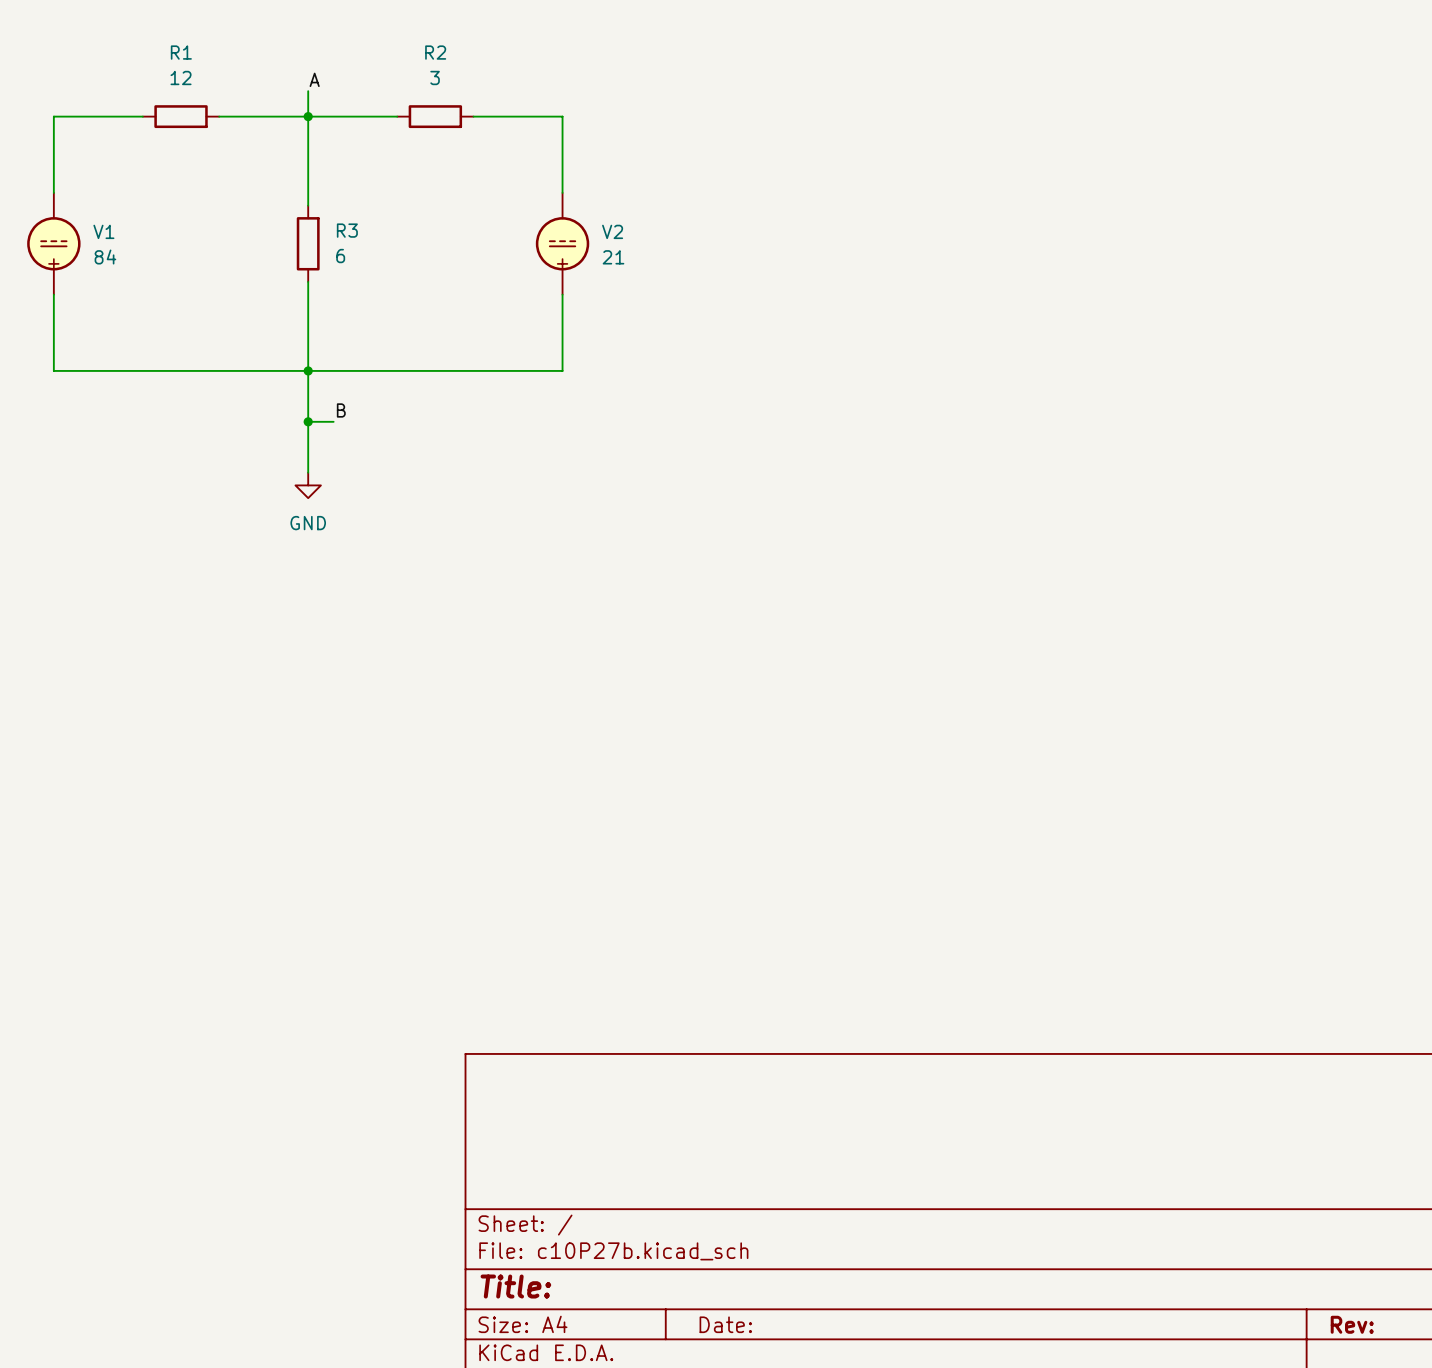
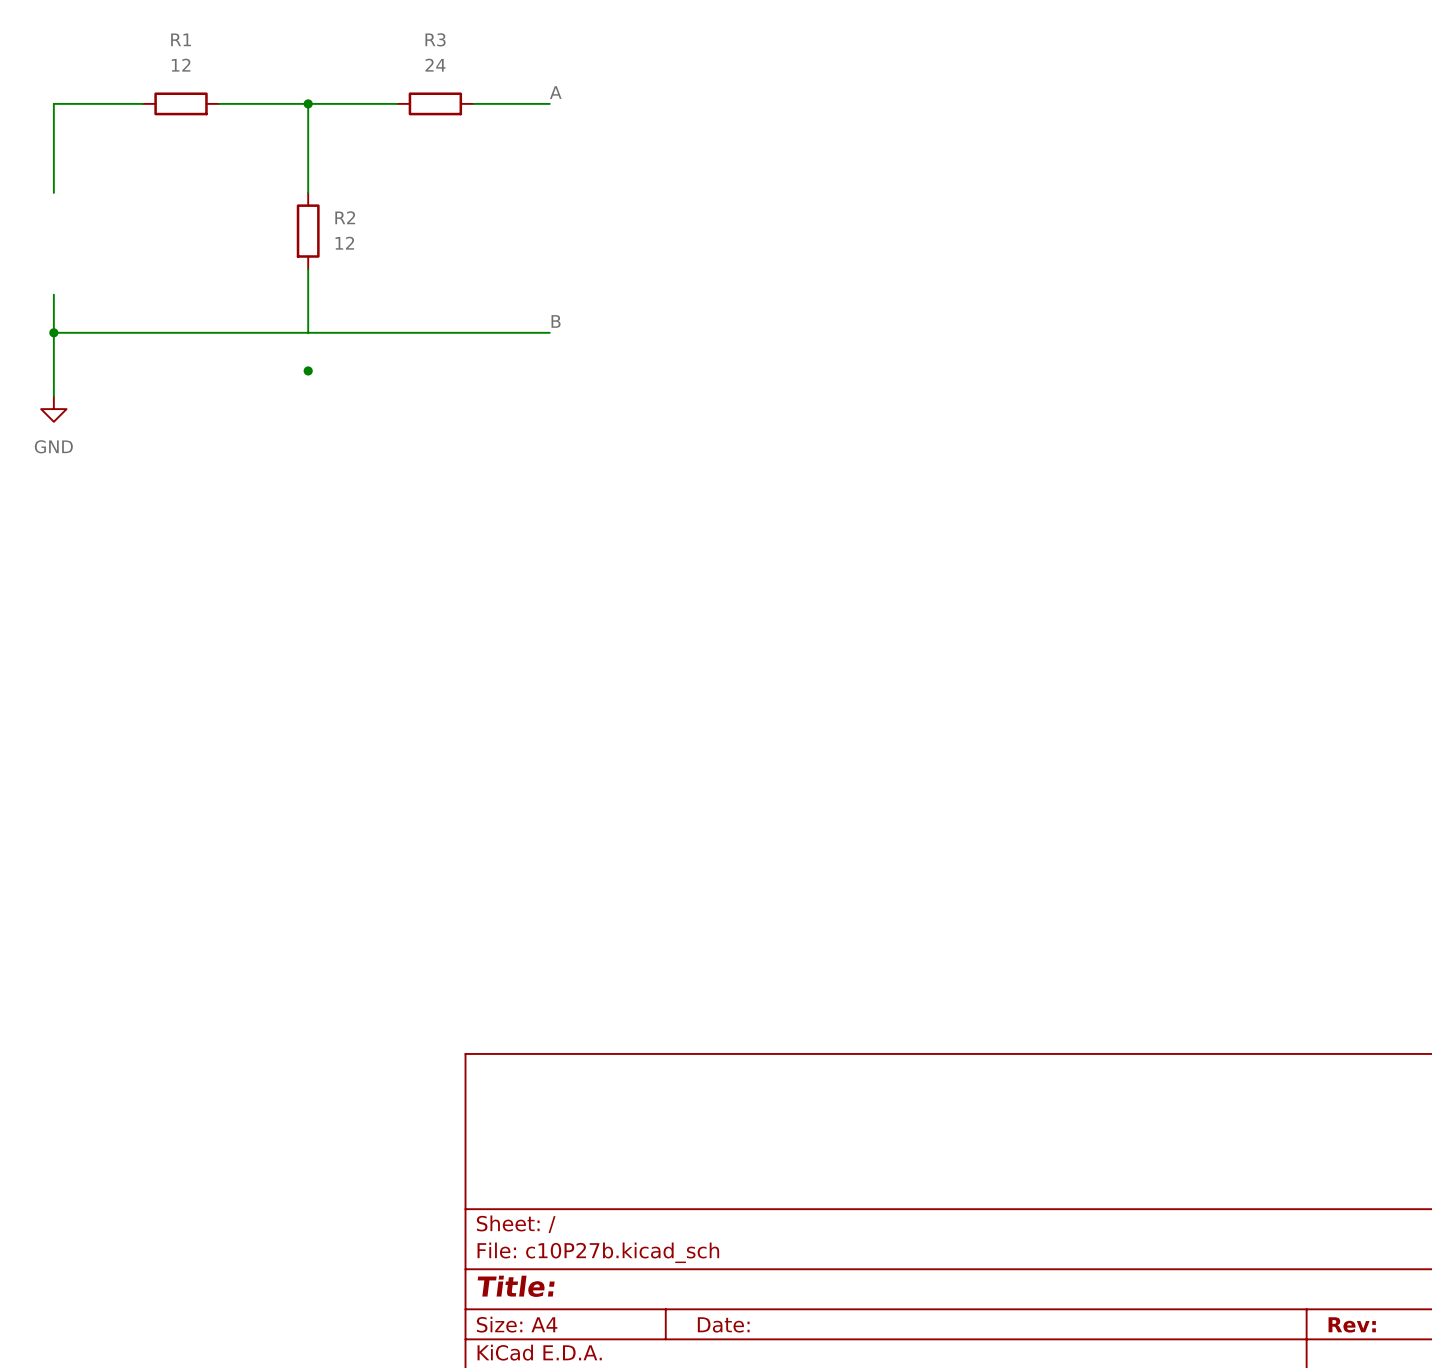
R2 name position: R2 (435, 52) -> R2 (345, 217)
R2 value: 3 (435, 77) -> 12 (344, 243)
label position: A (314, 79) -> A (555, 92)
wire: (308, 91) (308, 103) -> none
wire: none -> (473, 103) (549, 103)
wire: (53, 116) (142, 116) -> (53, 116) (53, 103) (142, 103)
R1 position: (181, 116) -> (181, 103)
wire: (219, 116) (397, 116) -> (219, 103) (397, 103)
junction position: (308, 116) -> (308, 103)
R2 rotation: 0° (435, 116) -> 90° clockwise (308, 231)
R2 position: (435, 116) -> (308, 231)
wire: (473, 116) (562, 116) (562, 192) -> none
R3 name position: R3 (347, 230) -> R3 (435, 39)
V1: 84 (53, 243) -> none
R3 rotation: 0° (308, 243) -> 90° clockwise (435, 103)
R3 position: (308, 243) -> (435, 103)
V2: 21 (562, 243) -> none
R3 value: 6 (340, 256) -> 24 (435, 65)
wire: (562, 294) (562, 370) (53, 370) -> (53, 396) (53, 370)
wire: none -> (53, 332) (549, 332)
junction: none -> (53, 332)
wire: (308, 332) (308, 472) -> none
power symbol: none -> GND (53, 409)
label position: B (341, 410) -> B (556, 321)
wire: (308, 421) (333, 421) -> none
junction: (308, 421) -> none
power symbol: GND (308, 485) -> none

